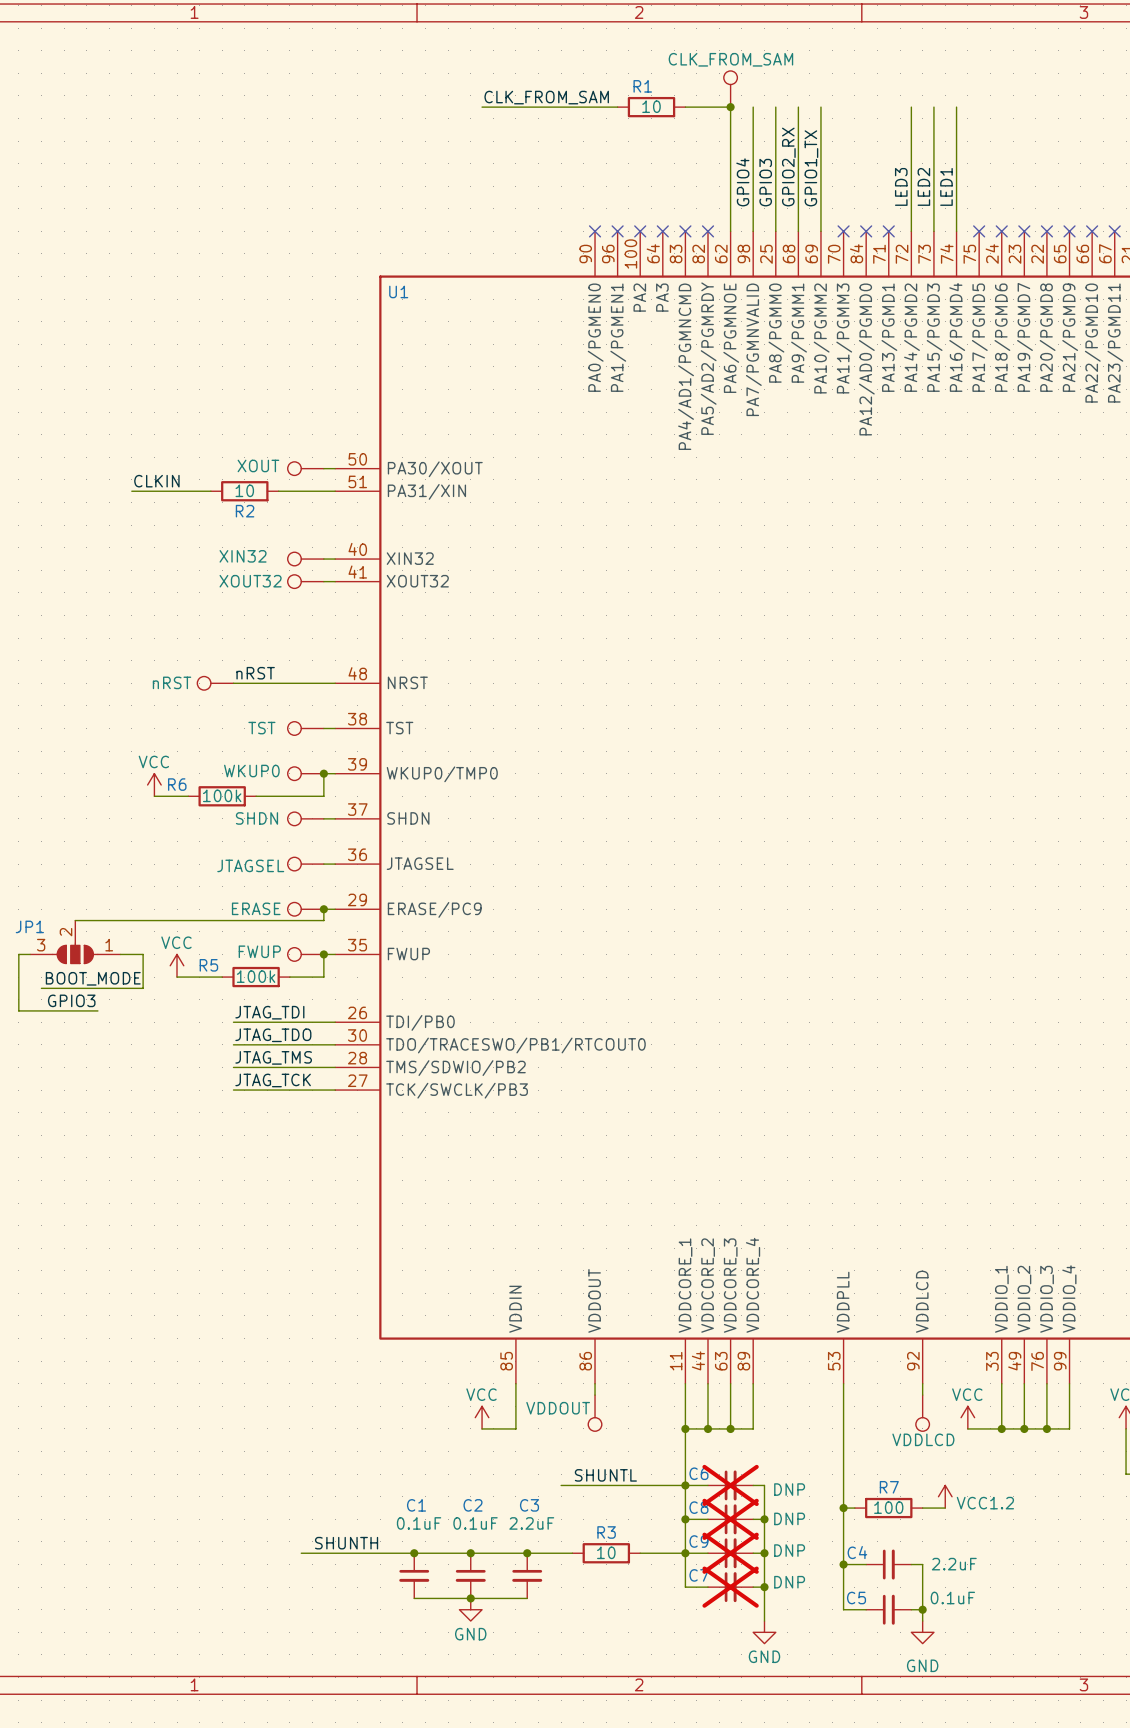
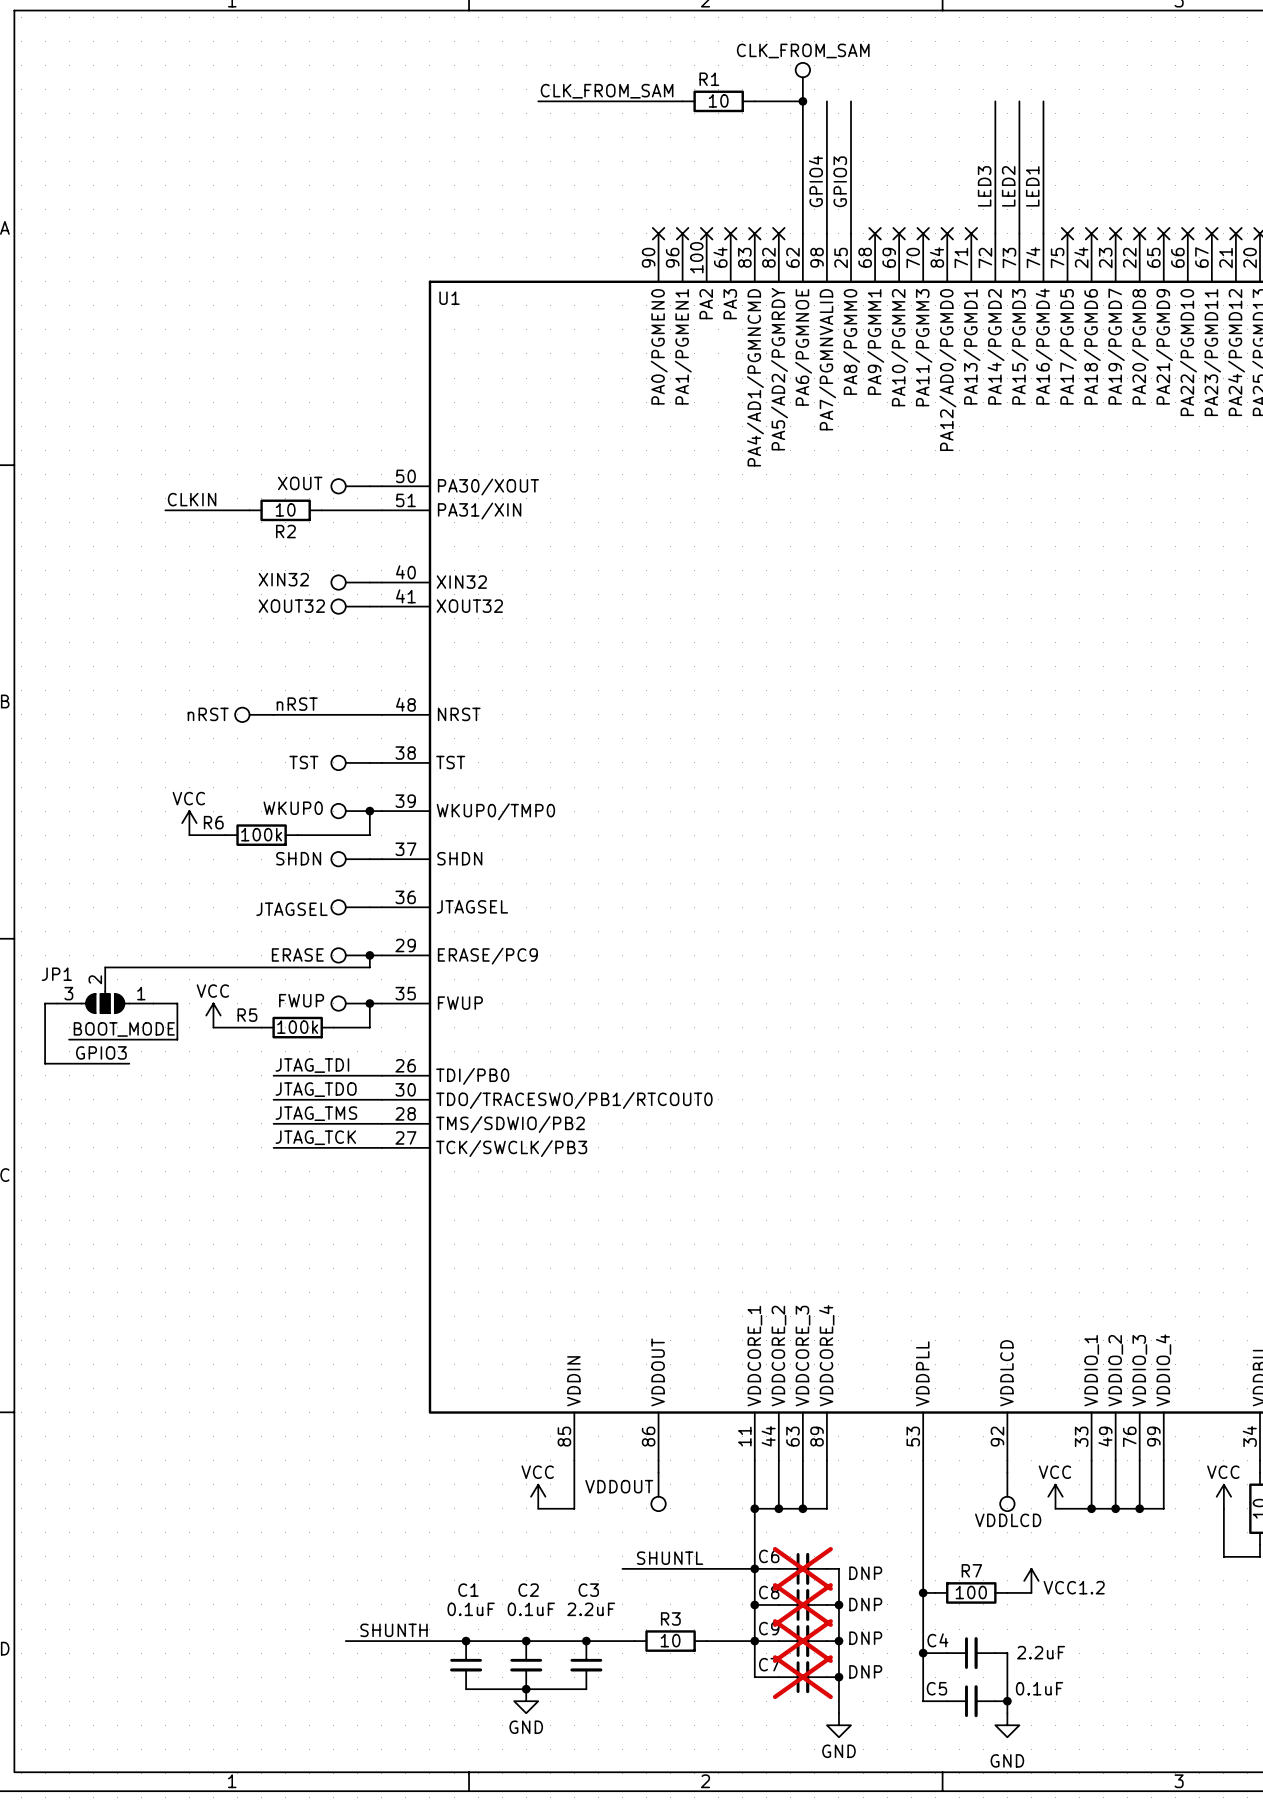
wire: (798, 107) (798, 231) -> none
wire: (820, 107) (820, 231) -> none
label: GPIO2_RX (788, 167) -> none
label: GPIO1_TX (811, 168) -> none
no-connect mark: none -> (875, 233)
no-connect mark: none -> (899, 233)

